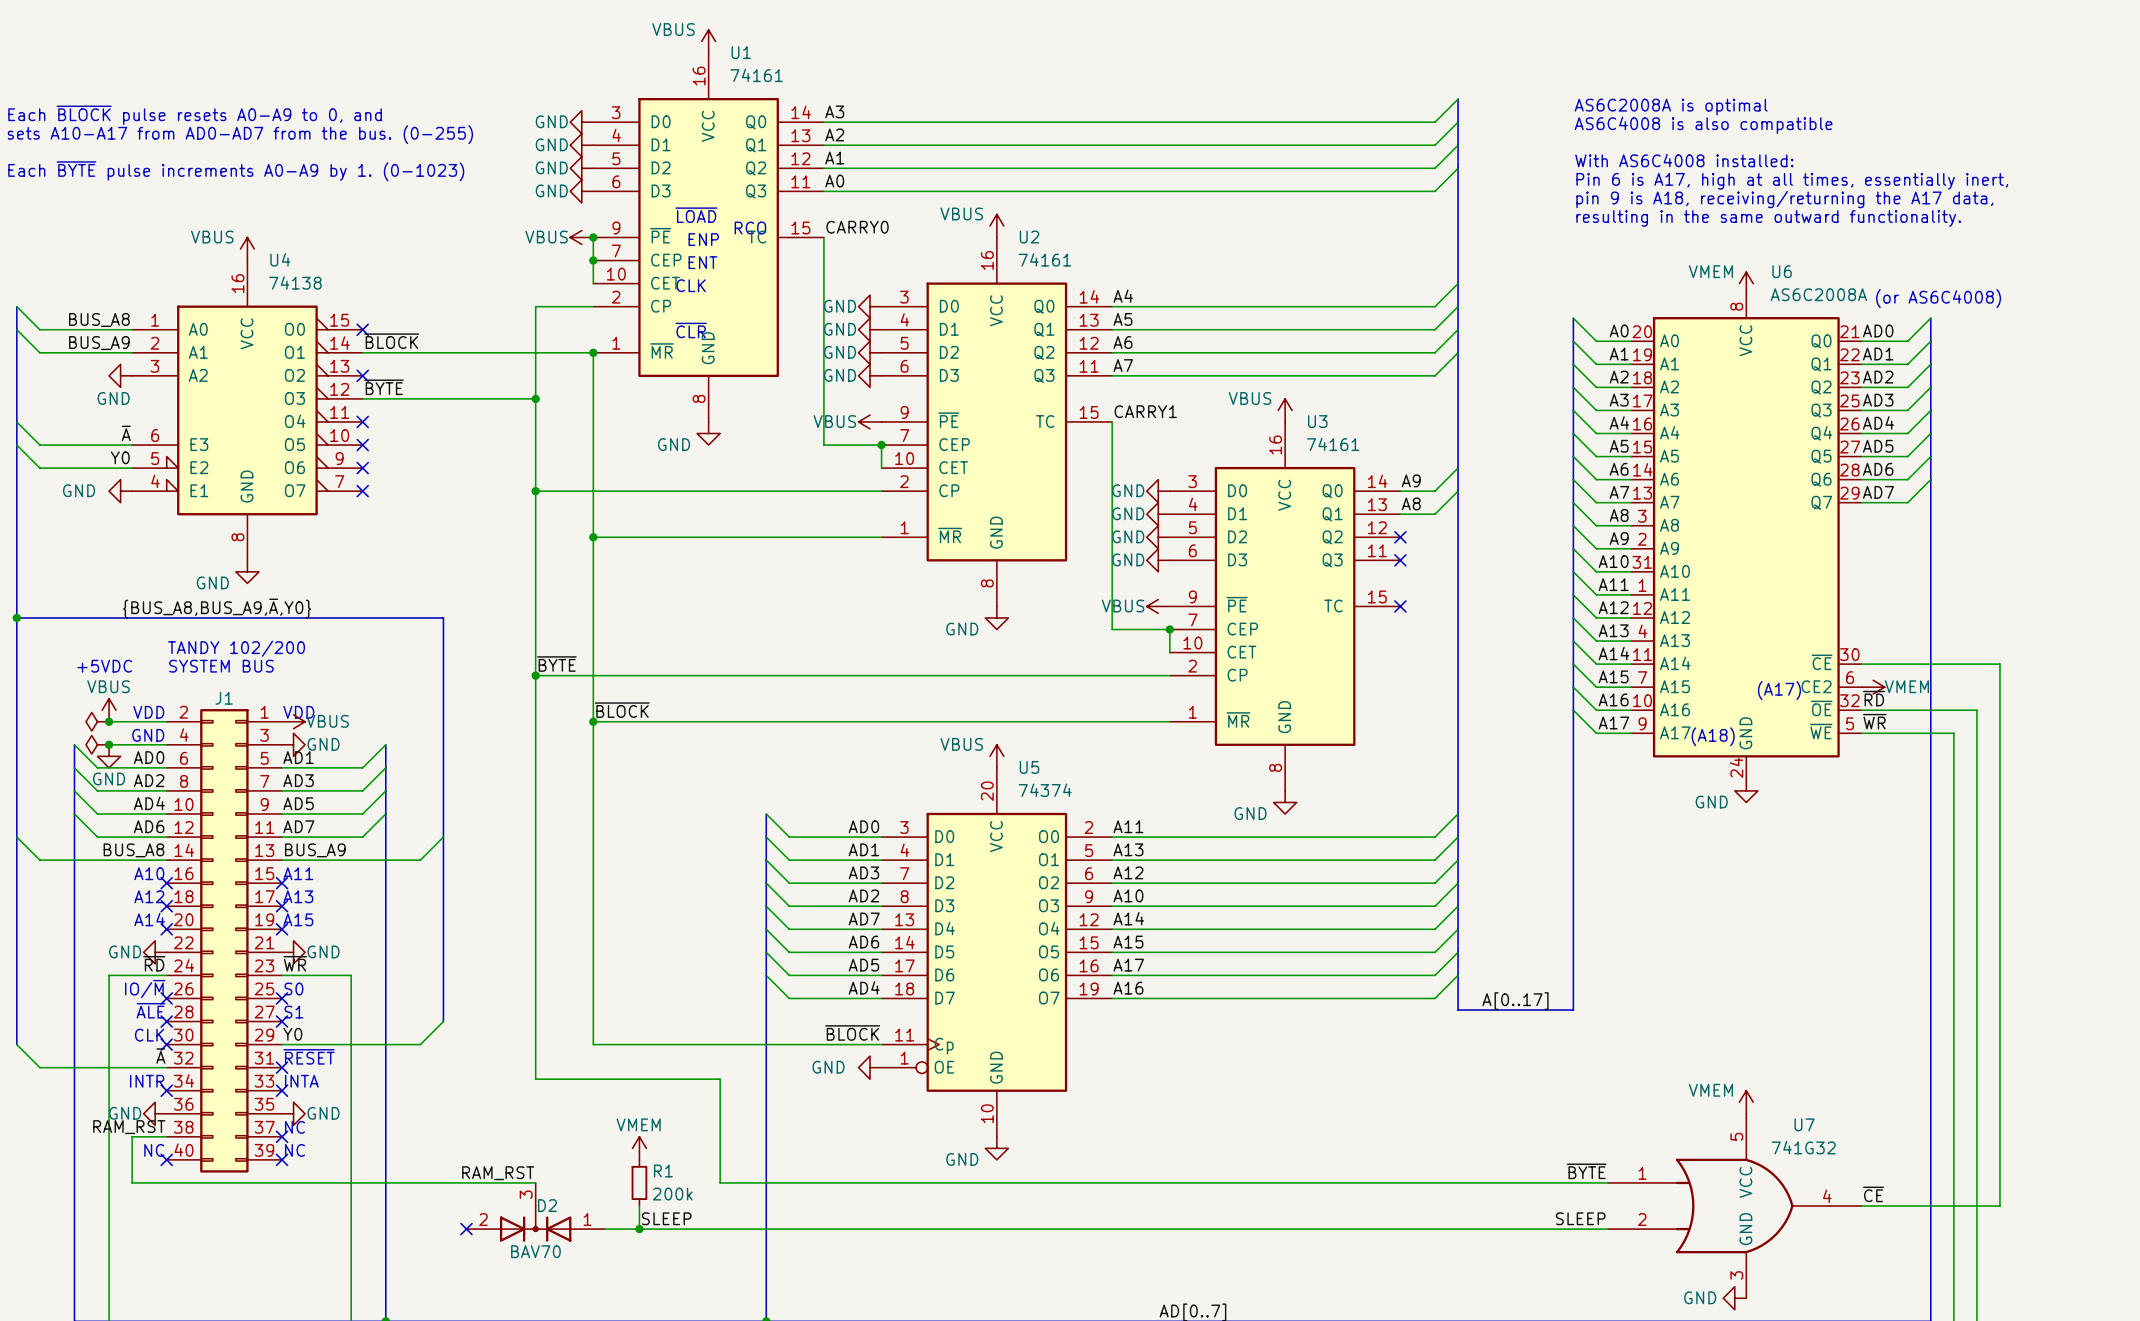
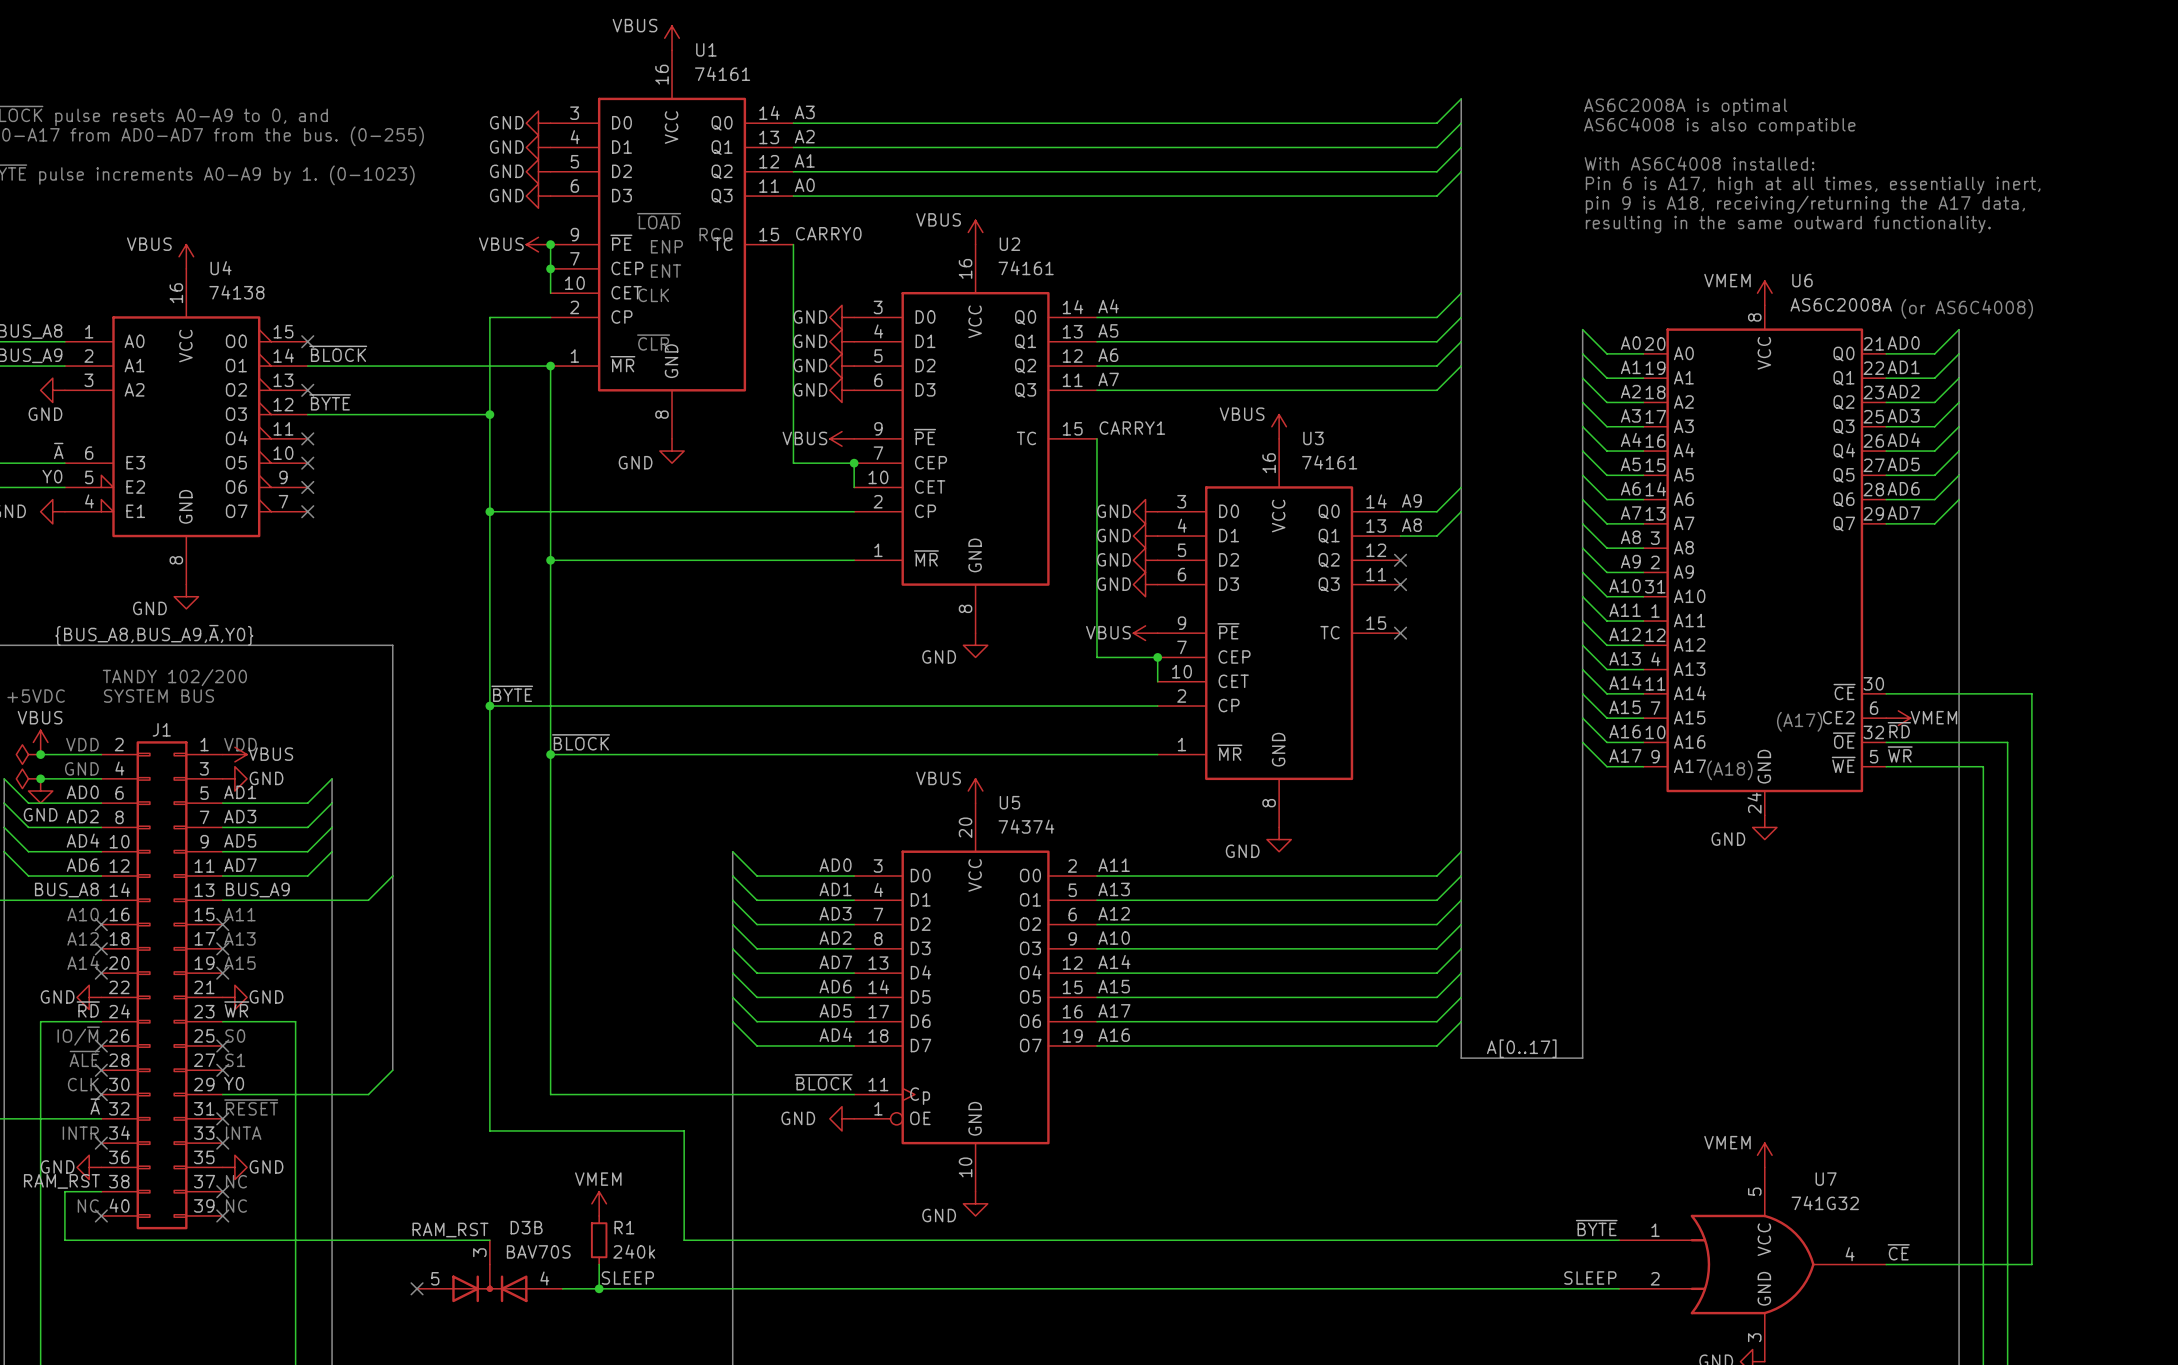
R1 value: 200k (672, 1194) -> 240k (634, 1251)
D2 name: D2 (547, 1205) -> D3B (526, 1227)
D2 pin number: 2 (483, 1219) -> 5 (435, 1278)
D2 pin number: 1 (587, 1219) -> 4 (544, 1278)
D2 value: BAV70 (535, 1251) -> BAV70S (538, 1251)

